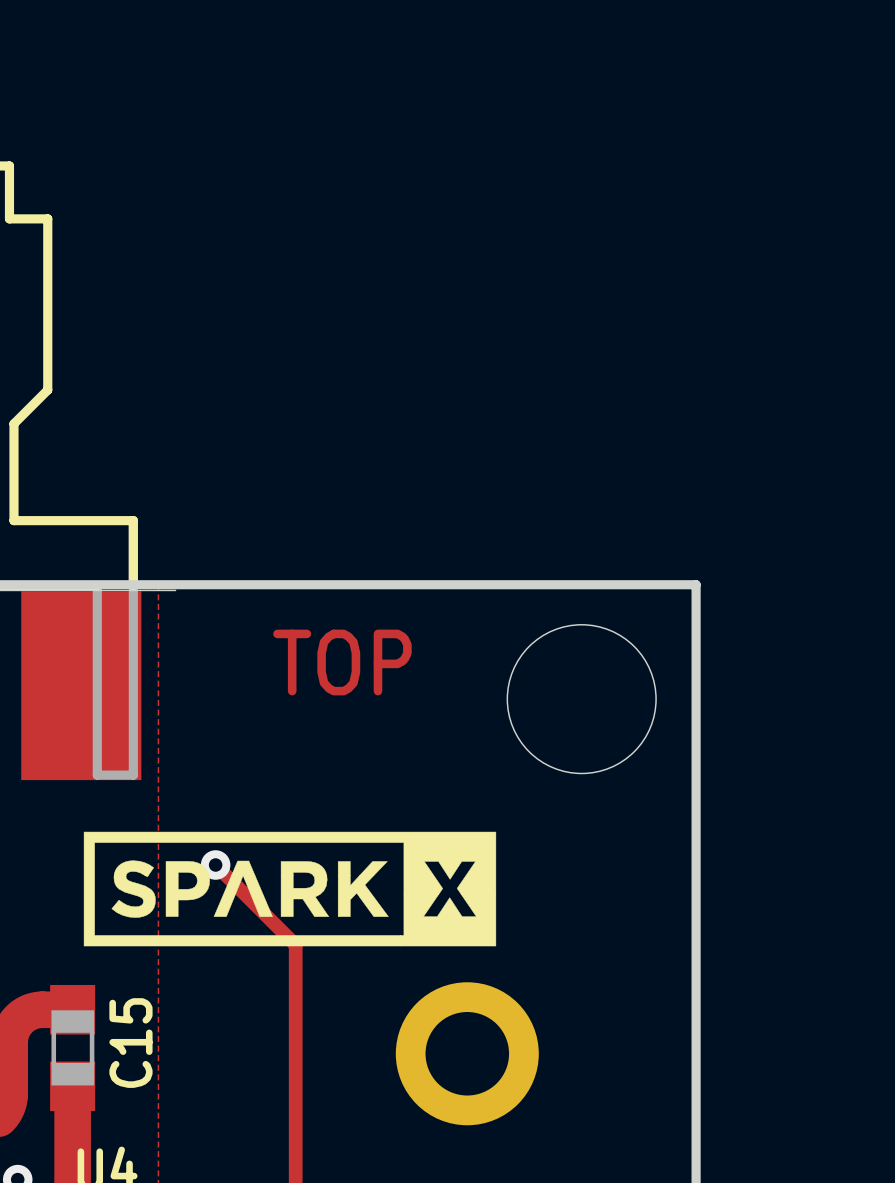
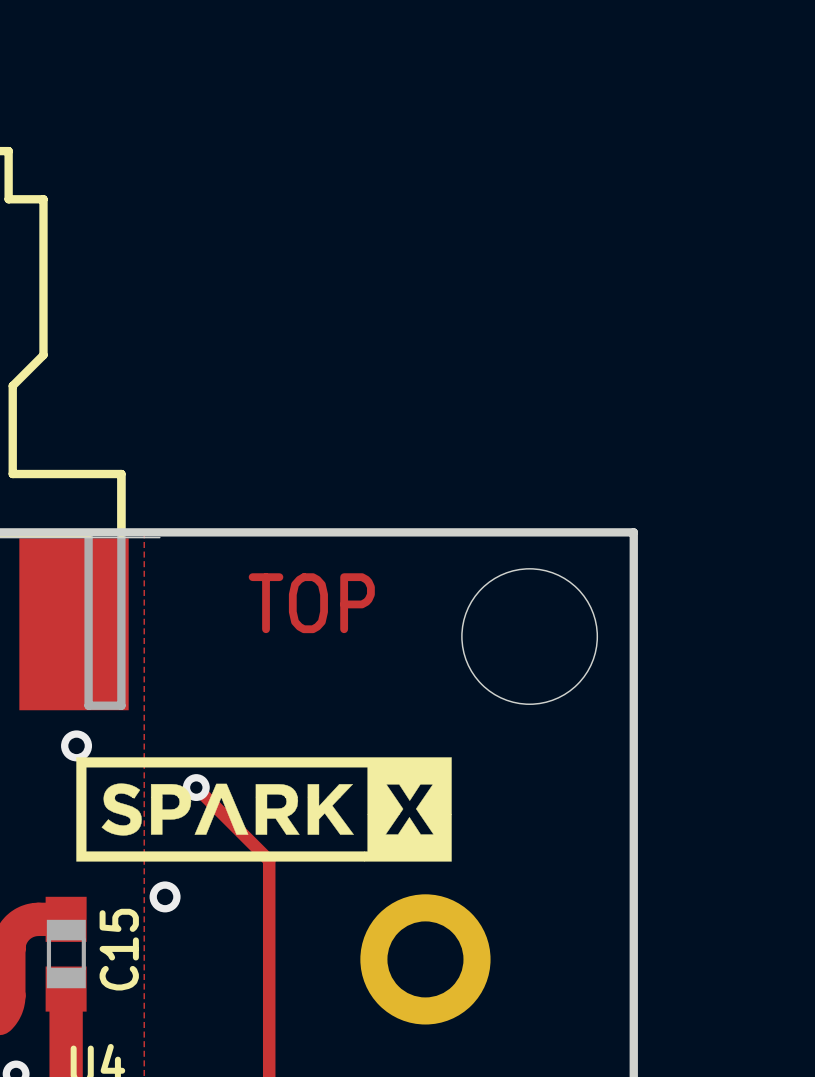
via: none -> (76, 745)
via: none -> (165, 896)

